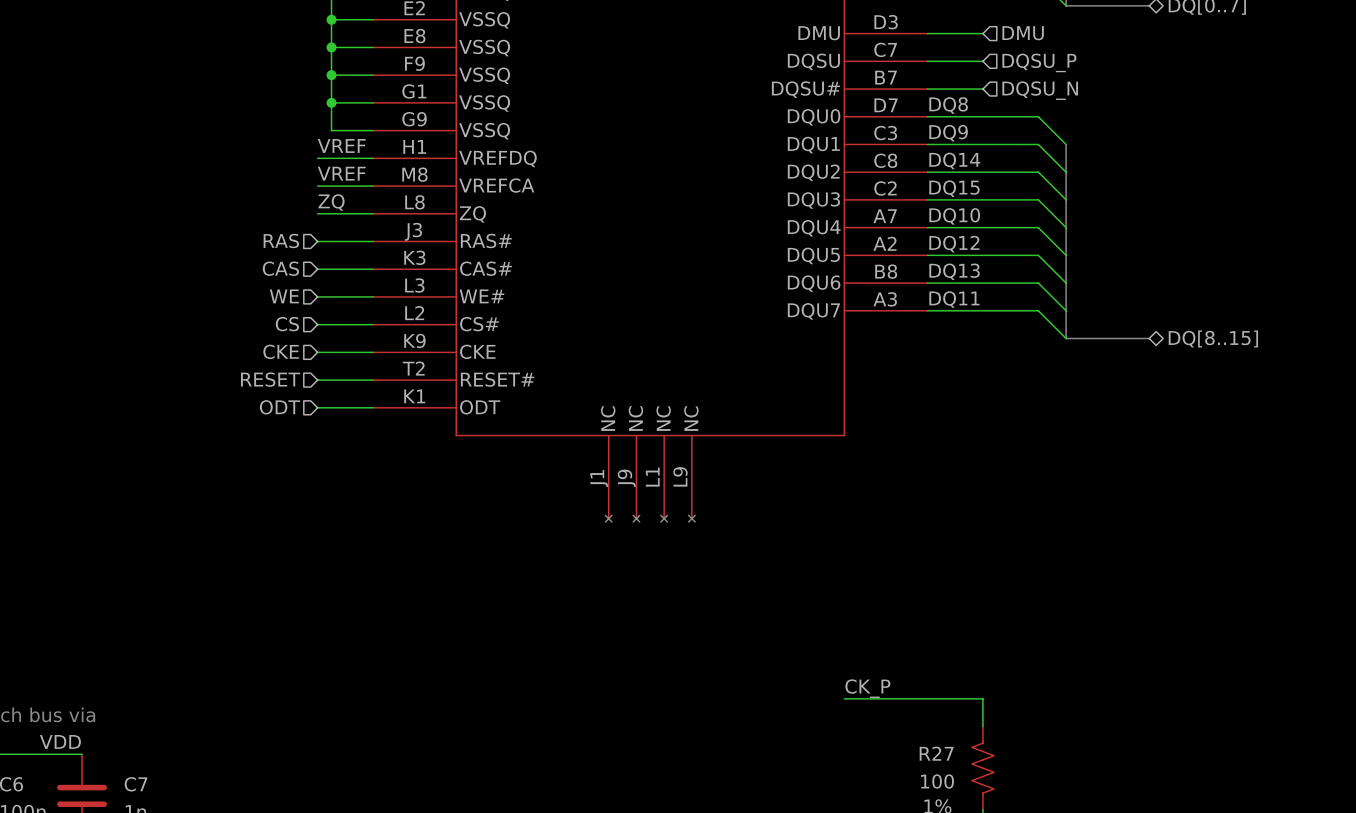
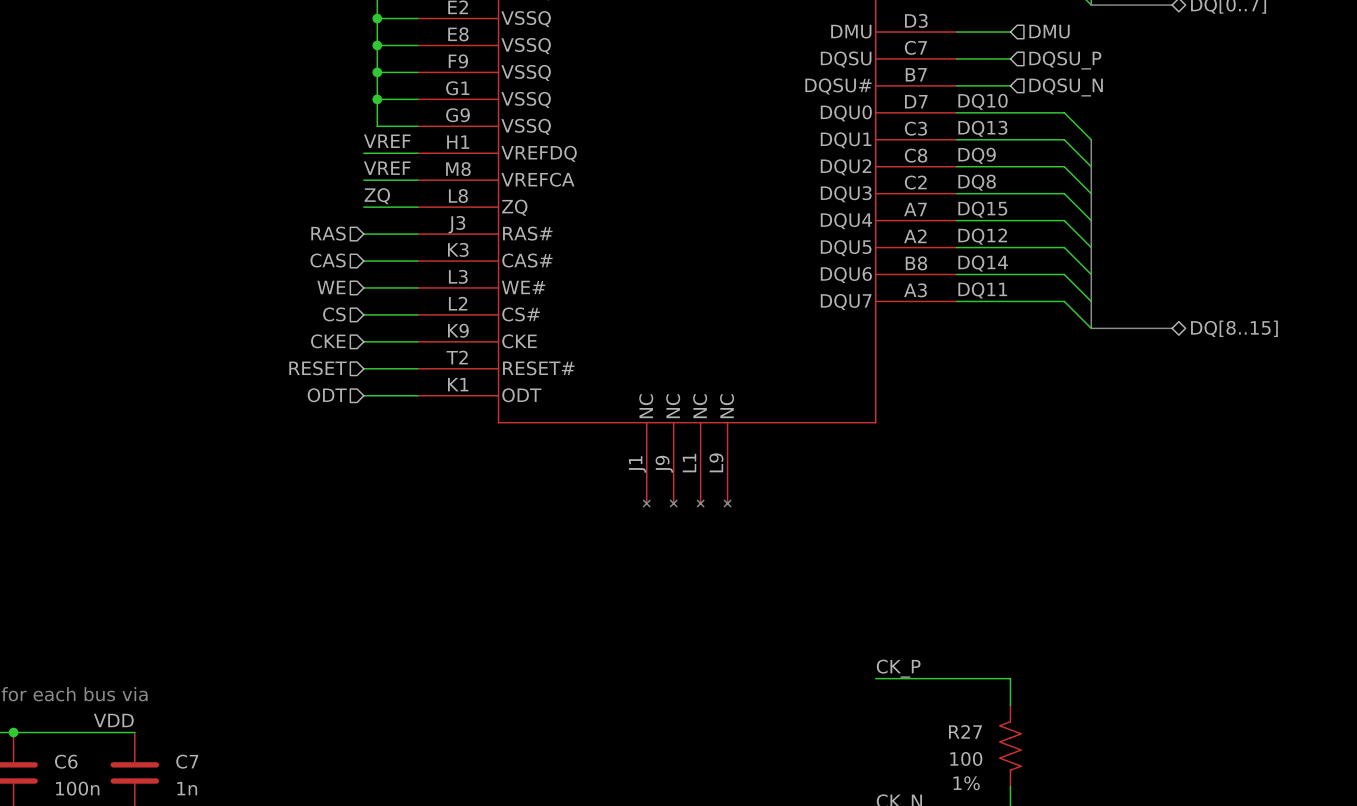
label: DQ8 (948, 105) -> DQ10 (983, 101)
label: DQ9 (948, 133) -> DQ13 (982, 128)
label: DQ14 (954, 160) -> DQ9 (977, 155)
label: DQ15 (954, 188) -> DQ8 (977, 182)
label: DQ10 (954, 216) -> DQ15 (982, 209)
label: DQ13 (954, 271) -> DQ14 (983, 263)

